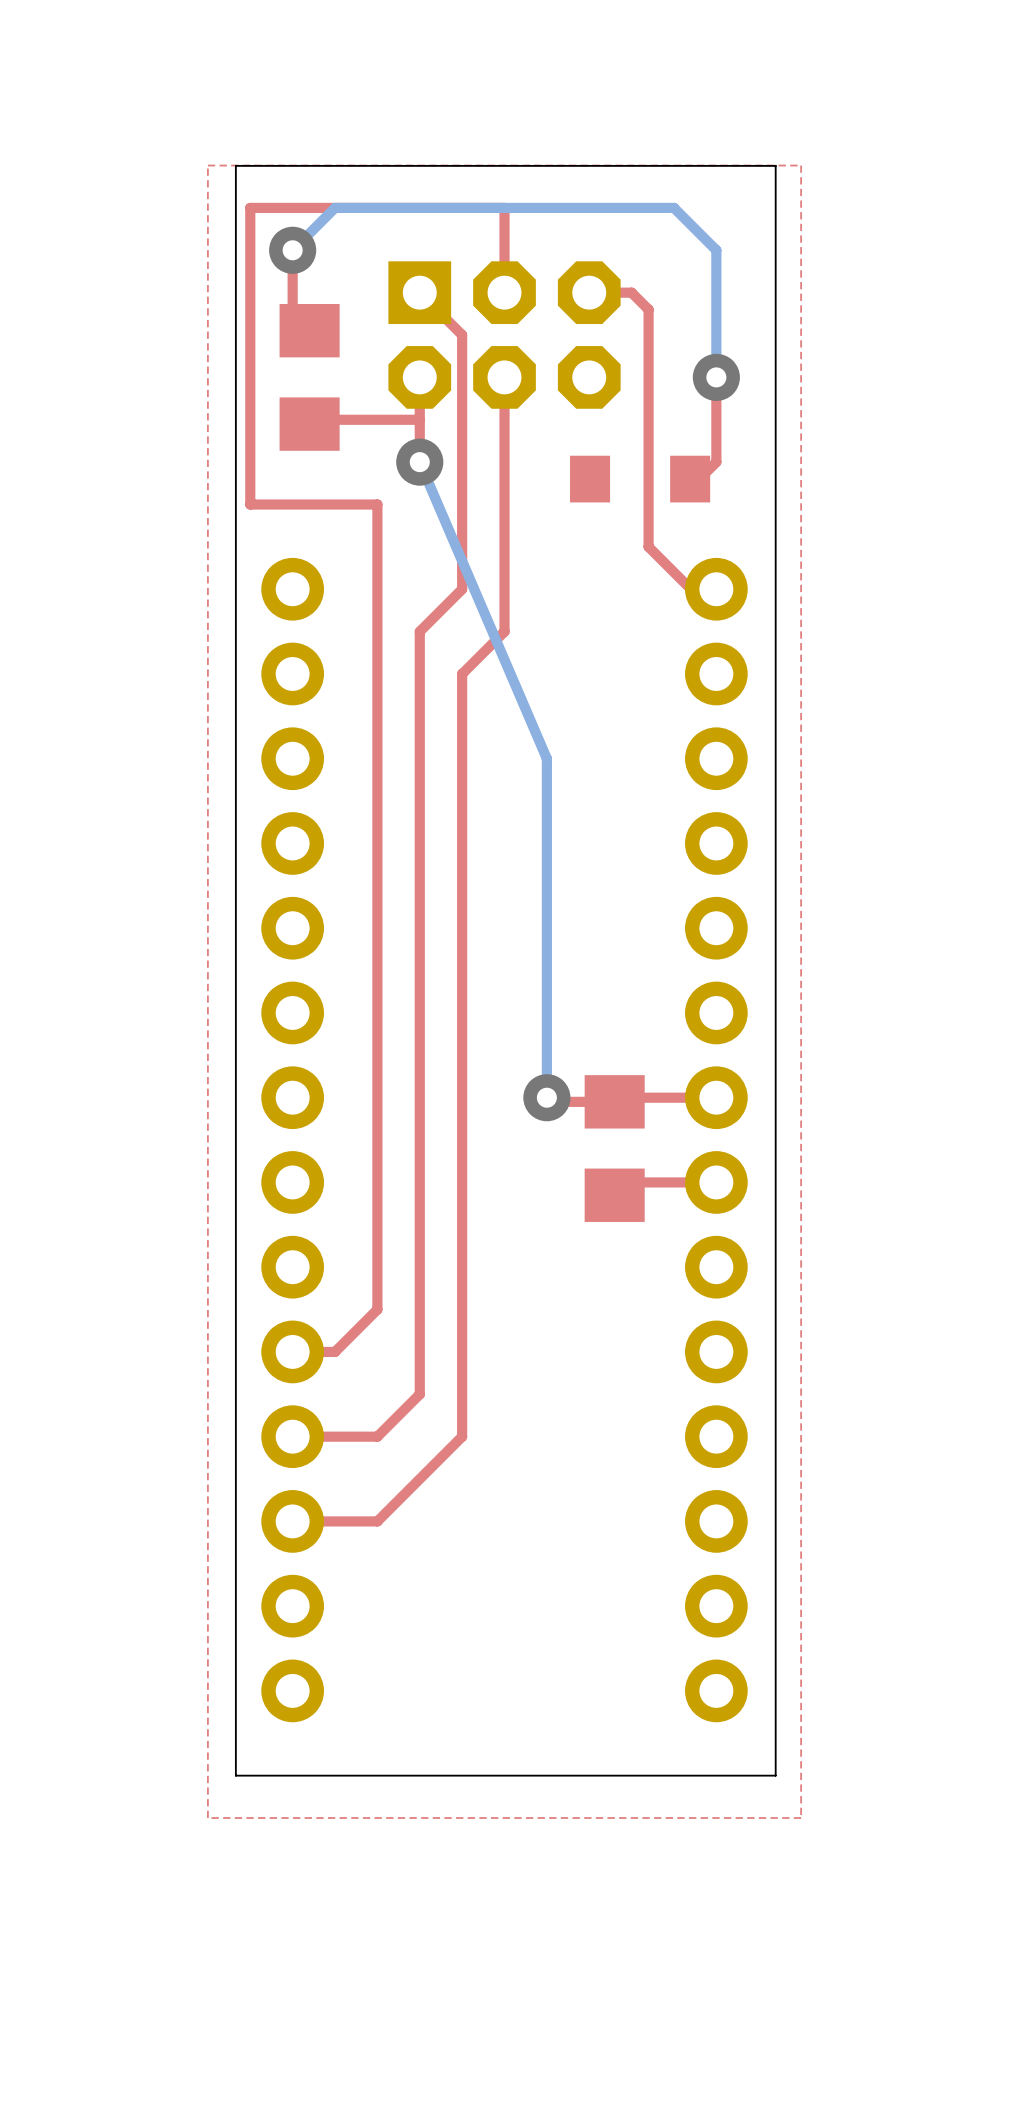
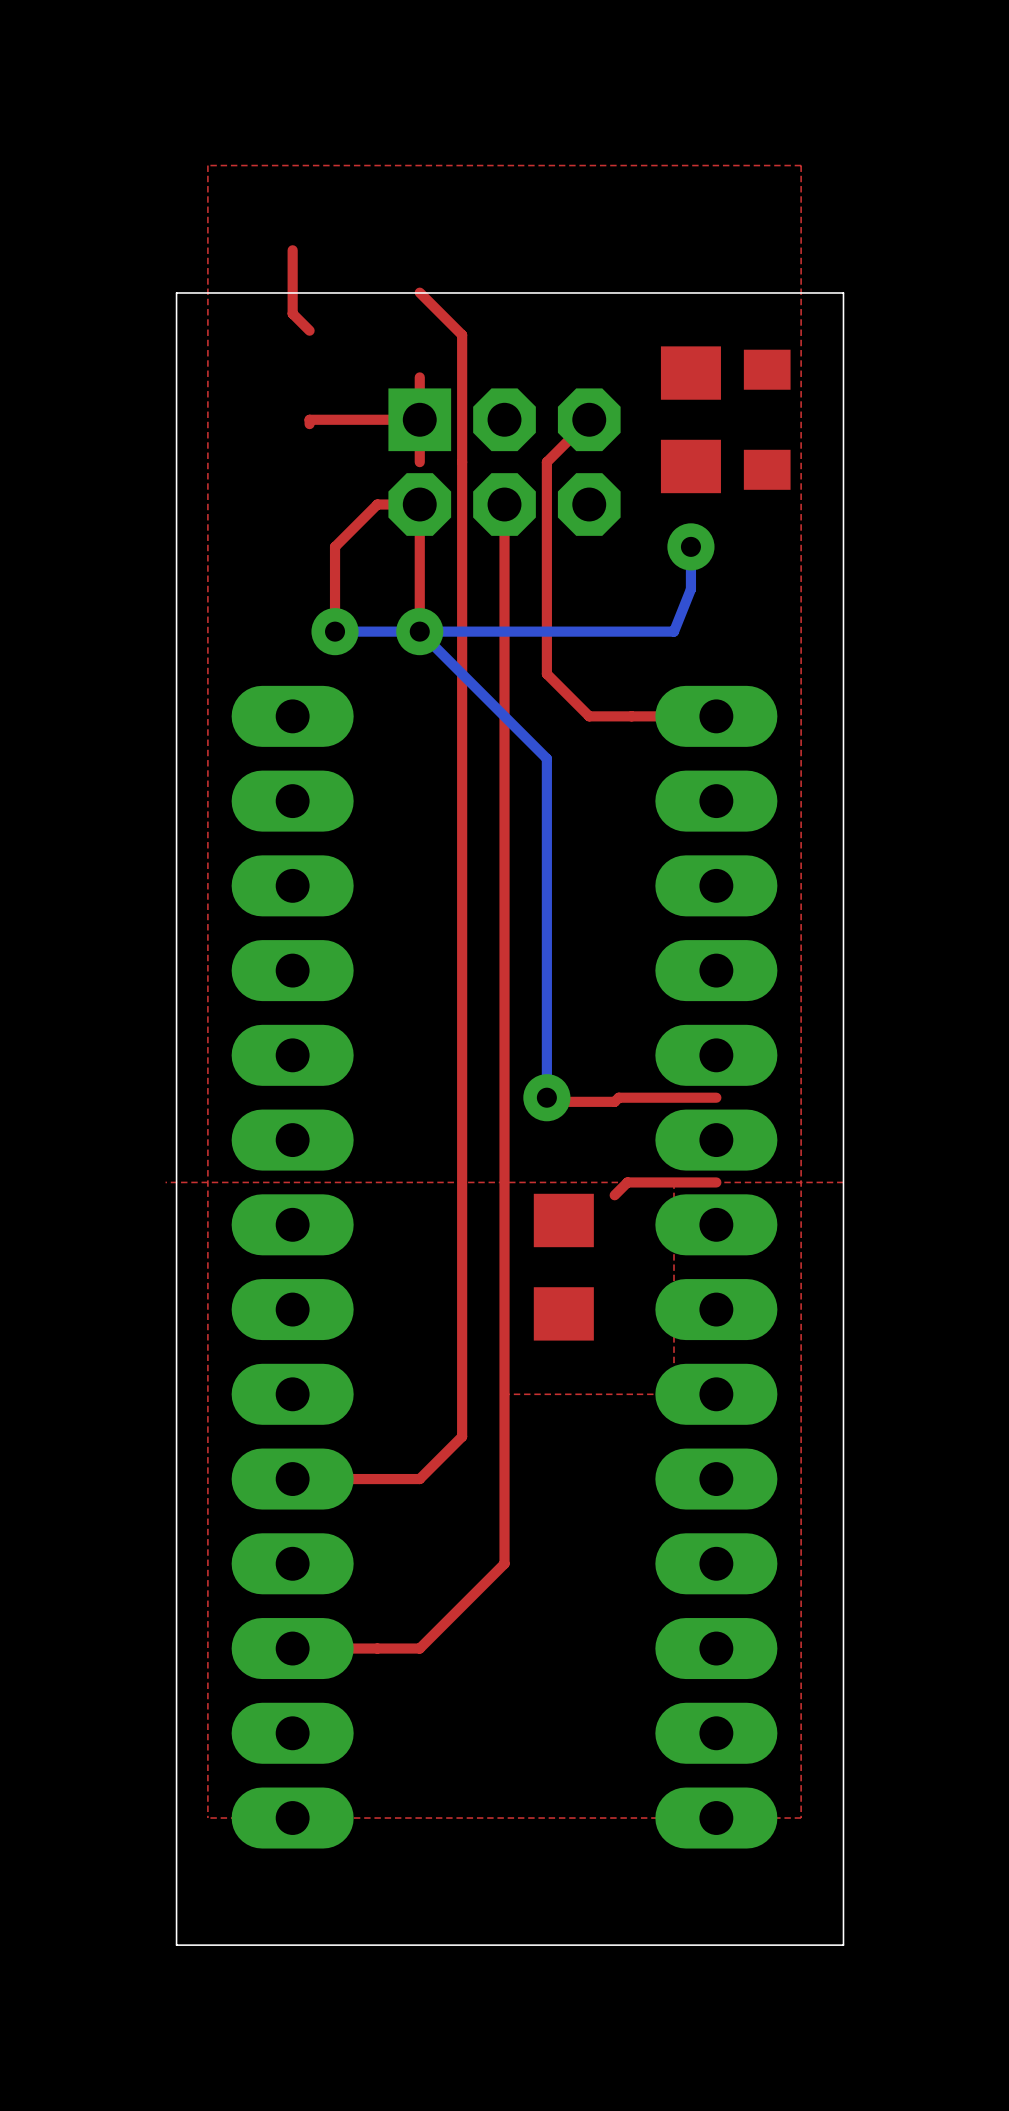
board edge: (775, 165) (235, 165) (235, 1775) (775, 1775) (775, 165) -> (843, 292) (843, 1945) (176, 1945) (176, 292) (843, 292)
bottom track: (292, 250) (335, 207) (673, 207) (716, 250) (716, 377) -> none
via: (292, 250) -> none
top track: (504, 292) (504, 207) (250, 207) (250, 504) (377, 504) (377, 1309) (335, 1351) (292, 1351) -> none
top track: (589, 292) (631, 292) (648, 309) (648, 546) (690, 589) (716, 589) -> none
part position: (504, 335) -> (504, 462)
part: (309, 377) -> none
top track: (504, 377) (504, 504) -> none
top track: (716, 377) (716, 462) (699, 479) (690, 479) -> none
via: (716, 377) -> none
top track: none -> (589, 419) (546, 462) (546, 673) (589, 716) (716, 716)
part: none -> (690, 419)
bottom track: (419, 462) (546, 758) -> (419, 631) (546, 758)
via: (419, 462) -> none
part rotation: 0° (640, 479) -> 90° clockwise (767, 419)
part position: (640, 479) -> (767, 419)
bottom track: none -> (690, 546) (690, 589) (673, 631) (335, 631)
via: none -> (690, 546)
top track: (462, 589) (419, 631) (419, 1394) (377, 1436) (292, 1436) -> none
via: none -> (335, 631)
top track: none -> (419, 631) (419, 504) (377, 504) (335, 546) (335, 631)
via: none -> (419, 631)
top track: (504, 631) (462, 673) -> (462, 589) (462, 673)
top track: none -> (504, 631) (504, 1563) (419, 1648) (292, 1648)
part: (292, 1140) -> none
part: (716, 1140) -> none
part position: (614, 1148) -> (563, 1267)
top zone outline: none -> (673, 1182) (673, 1394) (504, 1394) (504, 1182)
top zone outline: none -> (843, 1182) (165, 1182)
part: none -> (292, 1267)
part: none -> (716, 1267)
top track: (419, 1479) (377, 1521) (292, 1521) -> (419, 1479) (292, 1479)

